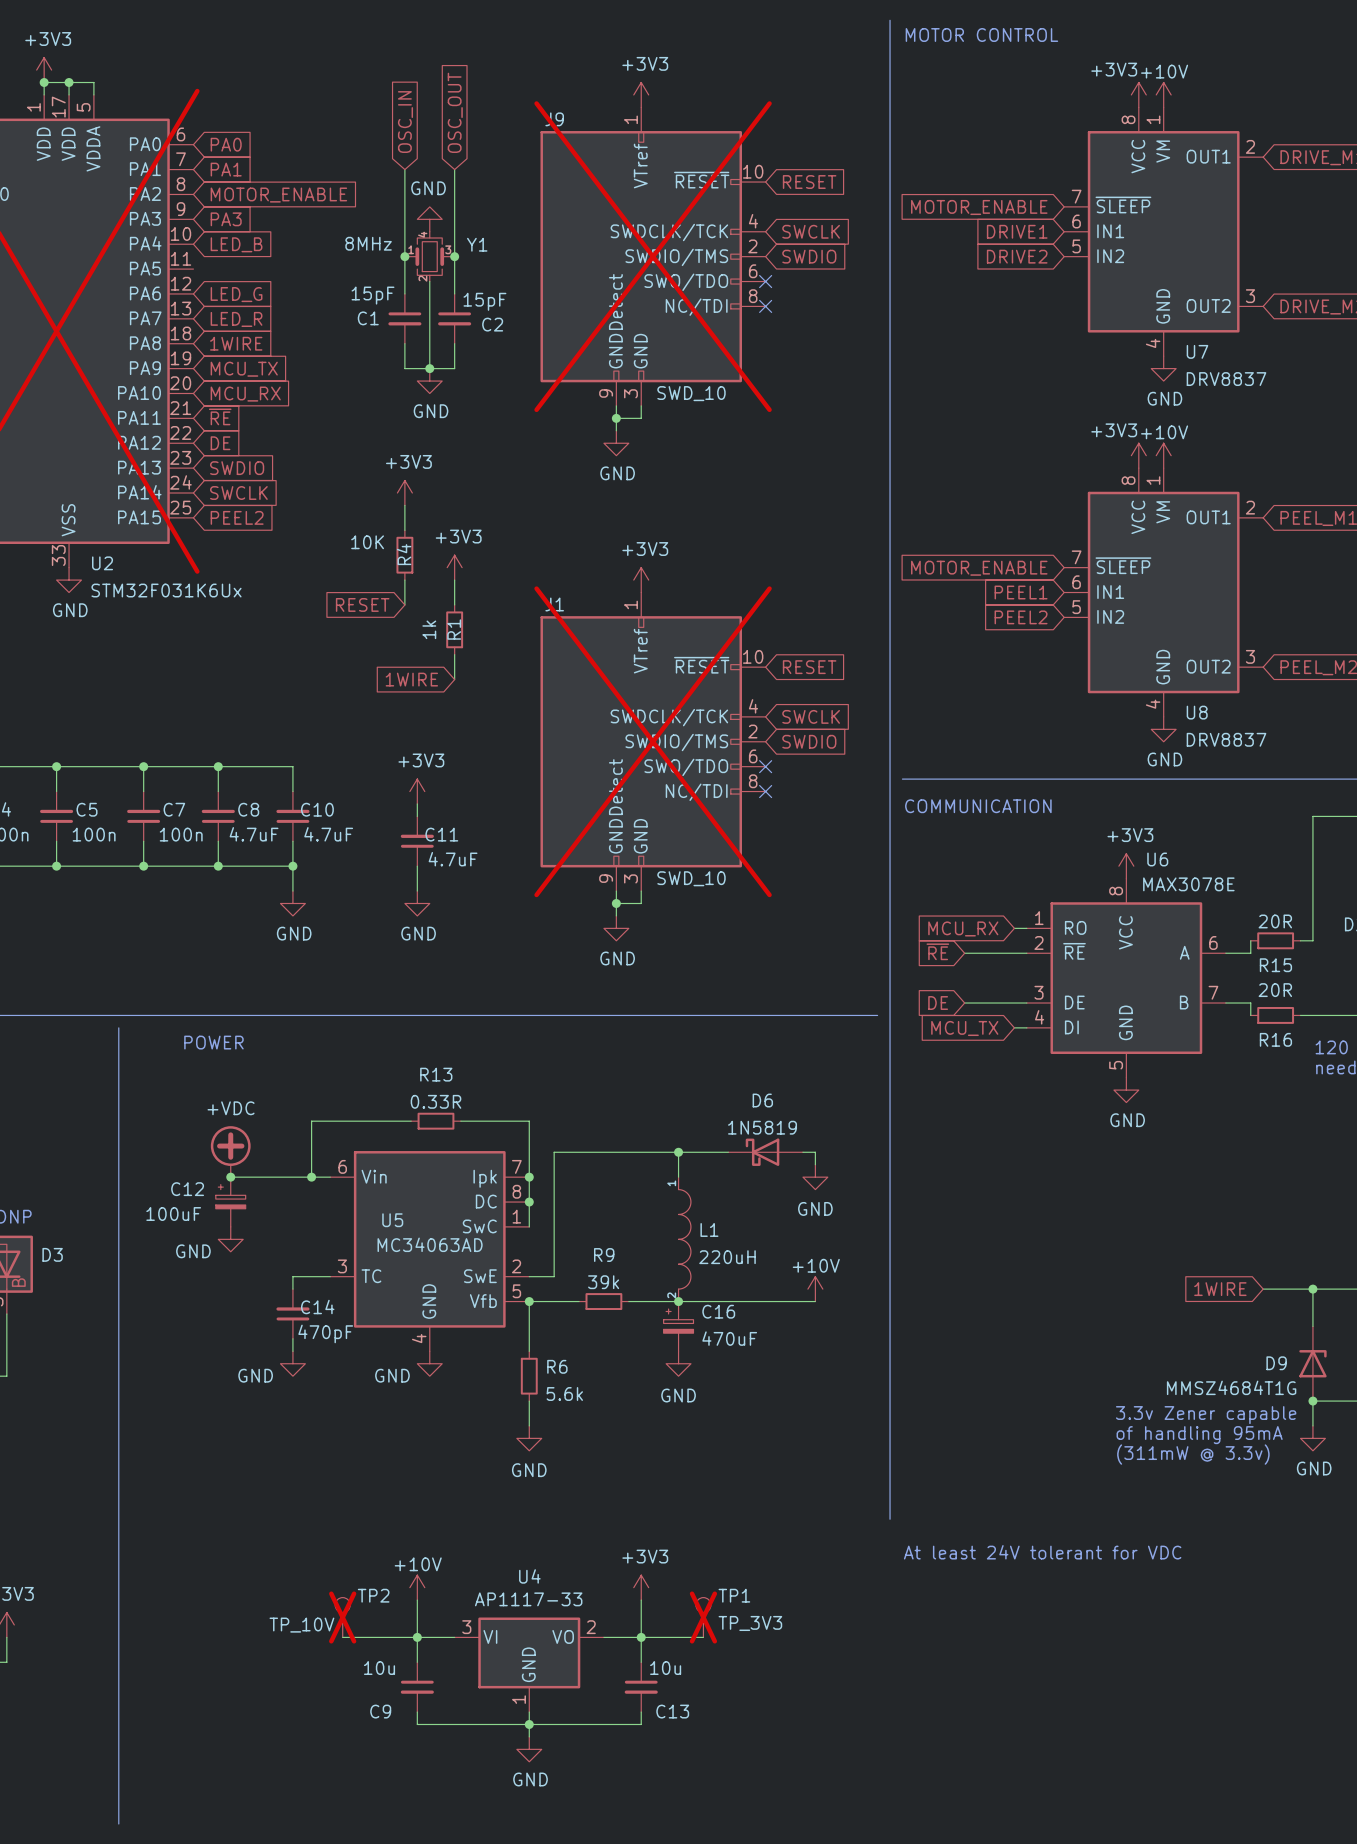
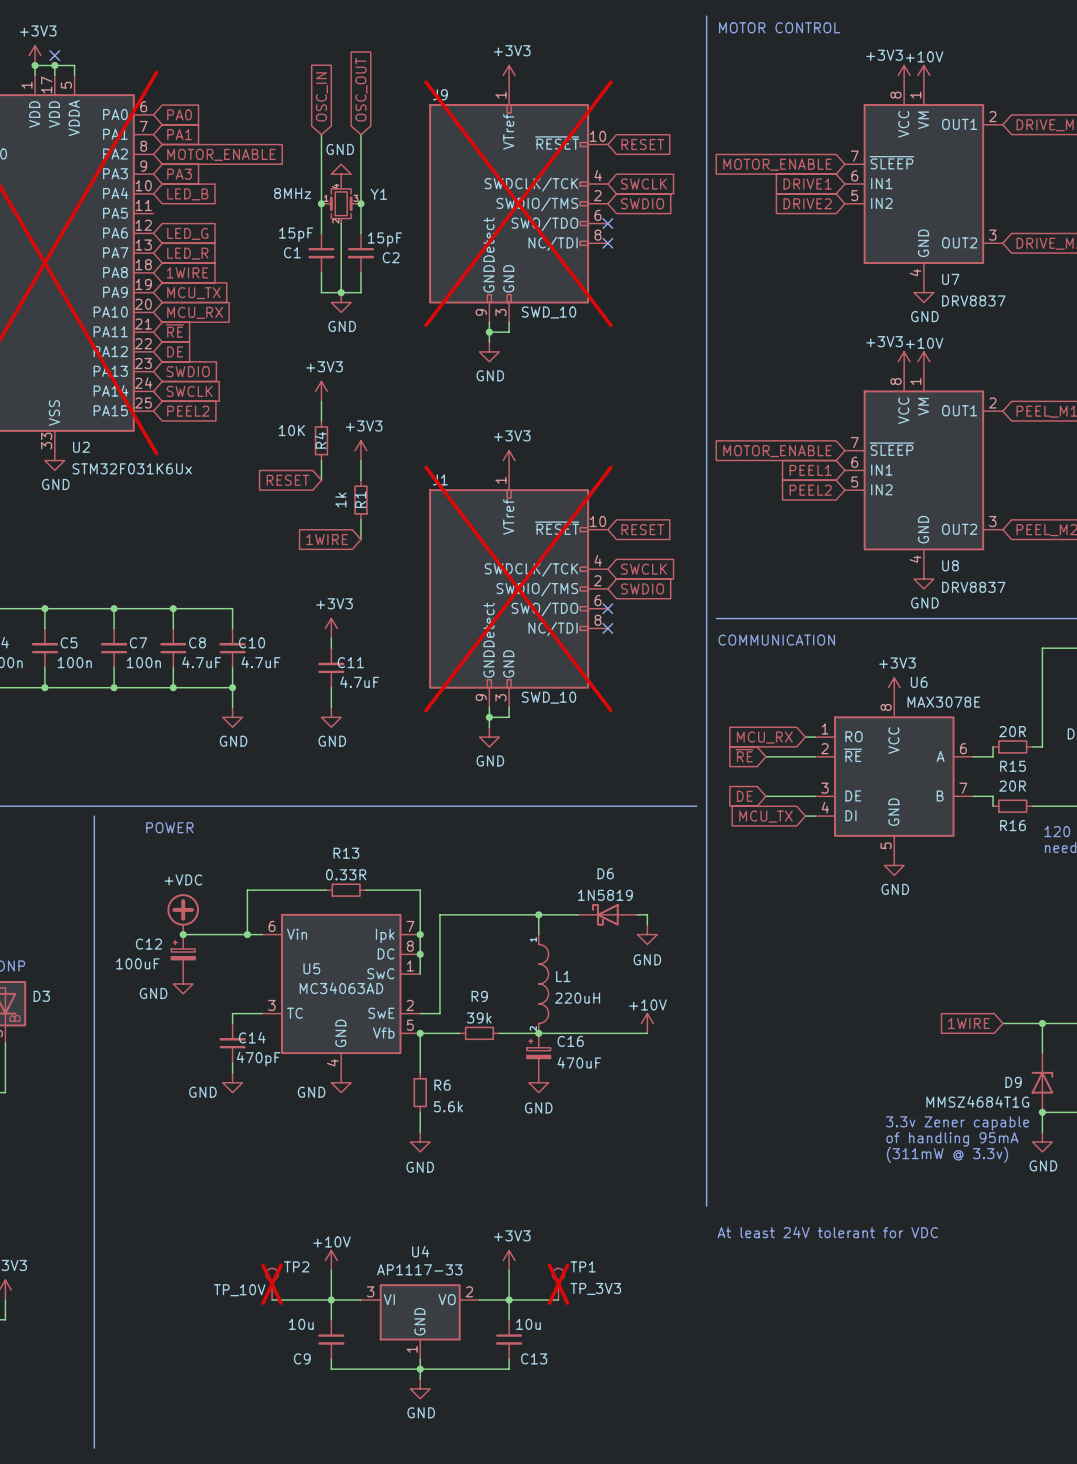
no-connect mark: none -> (54, 55)

